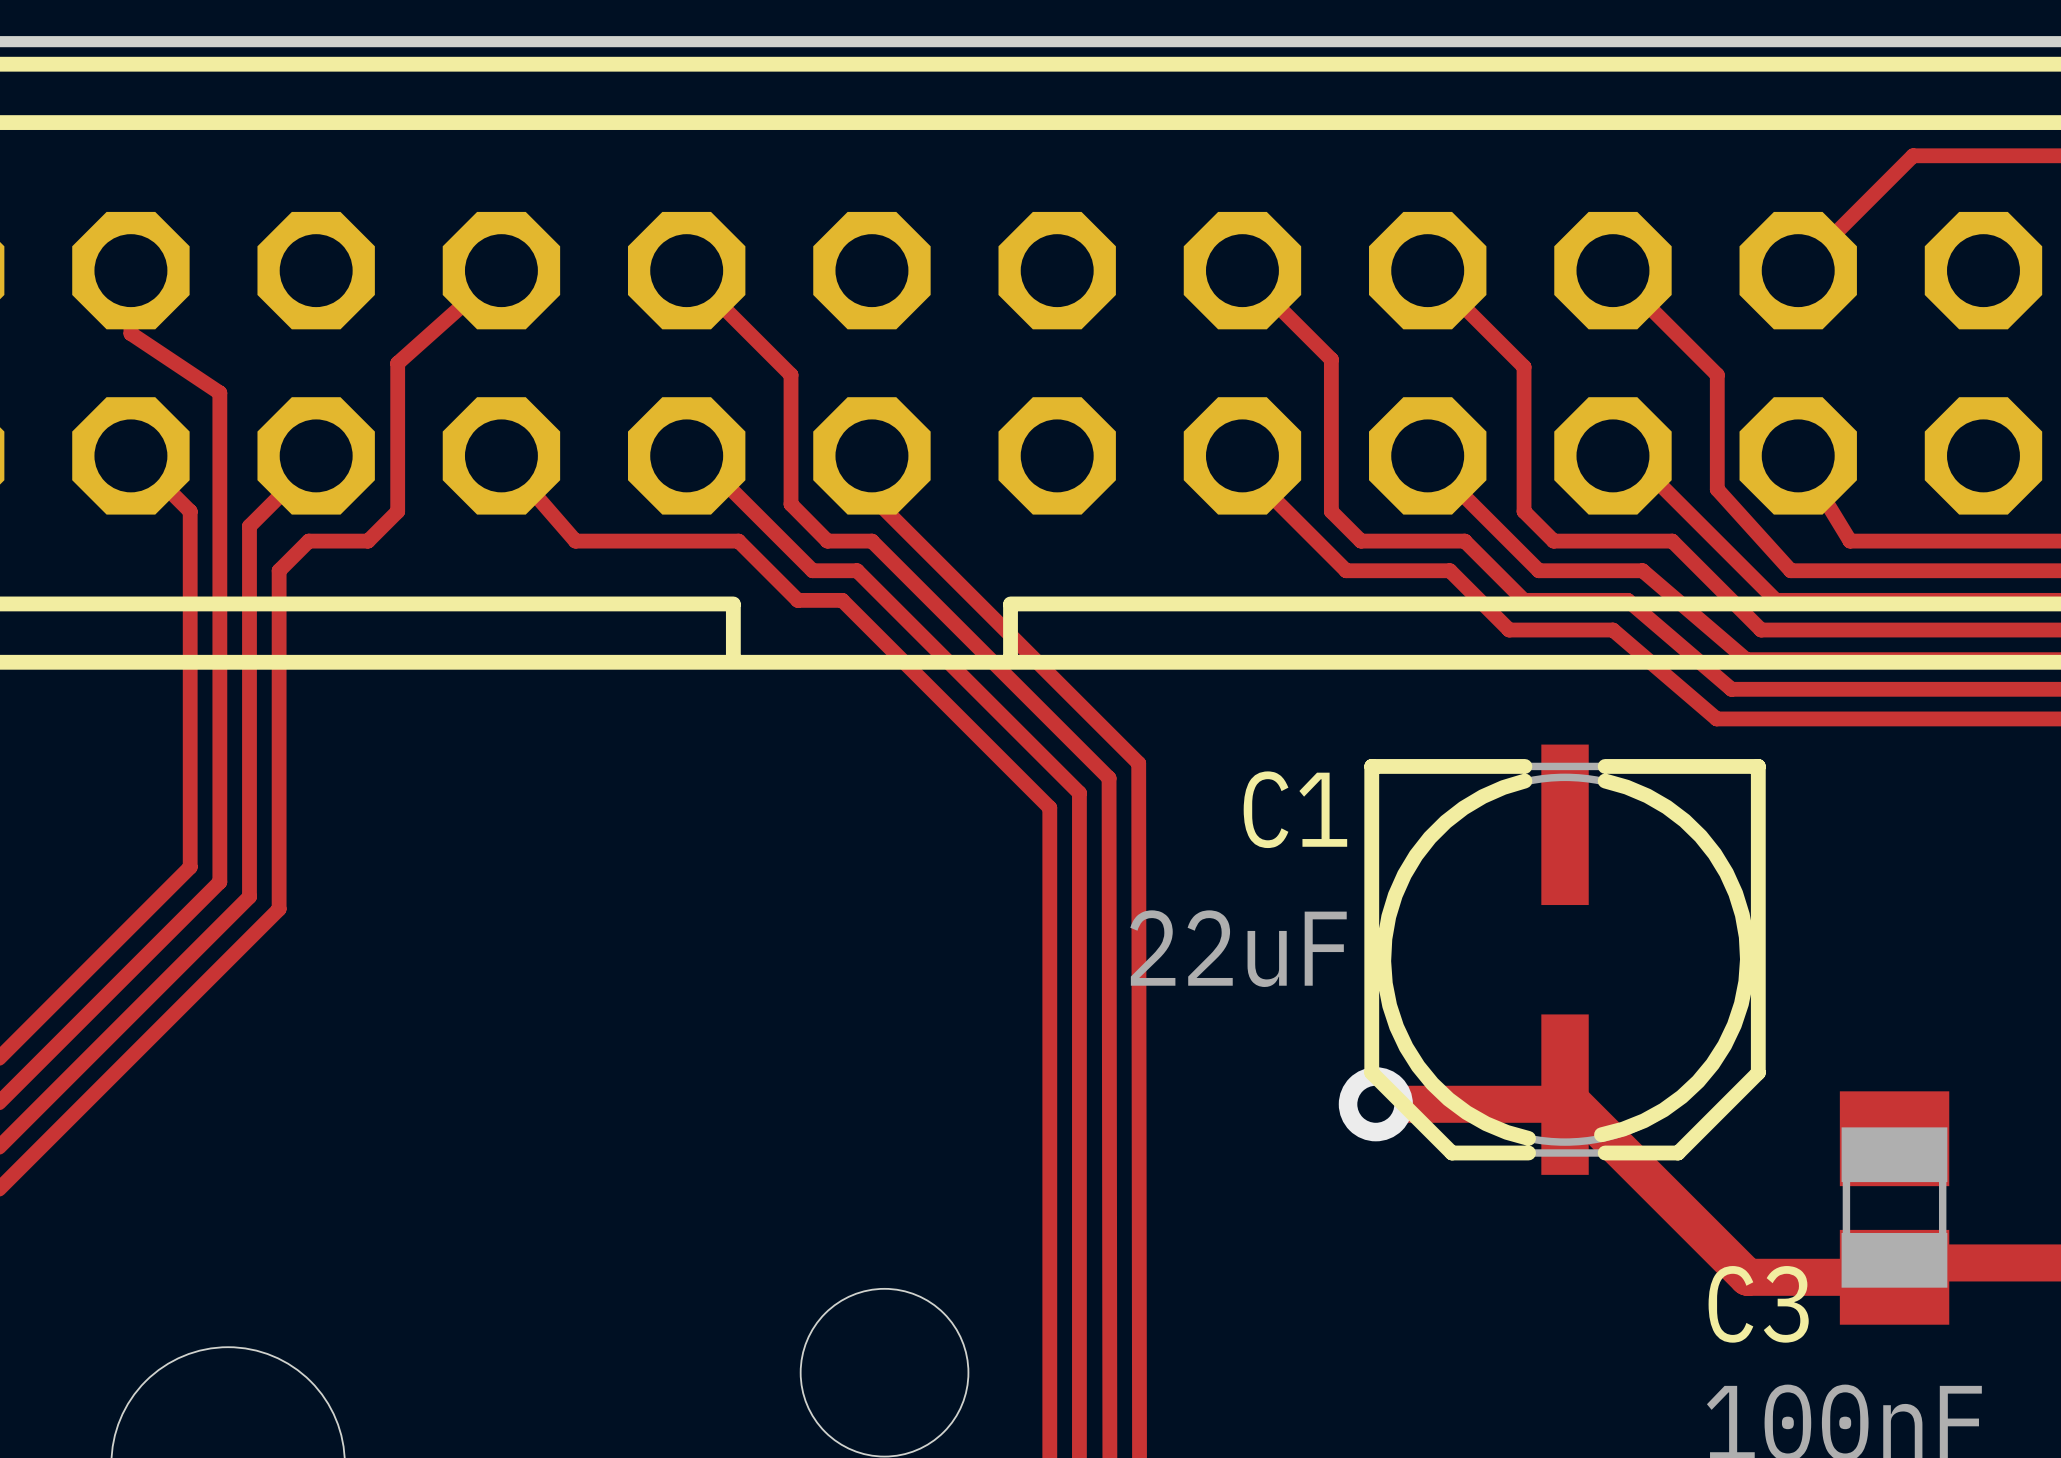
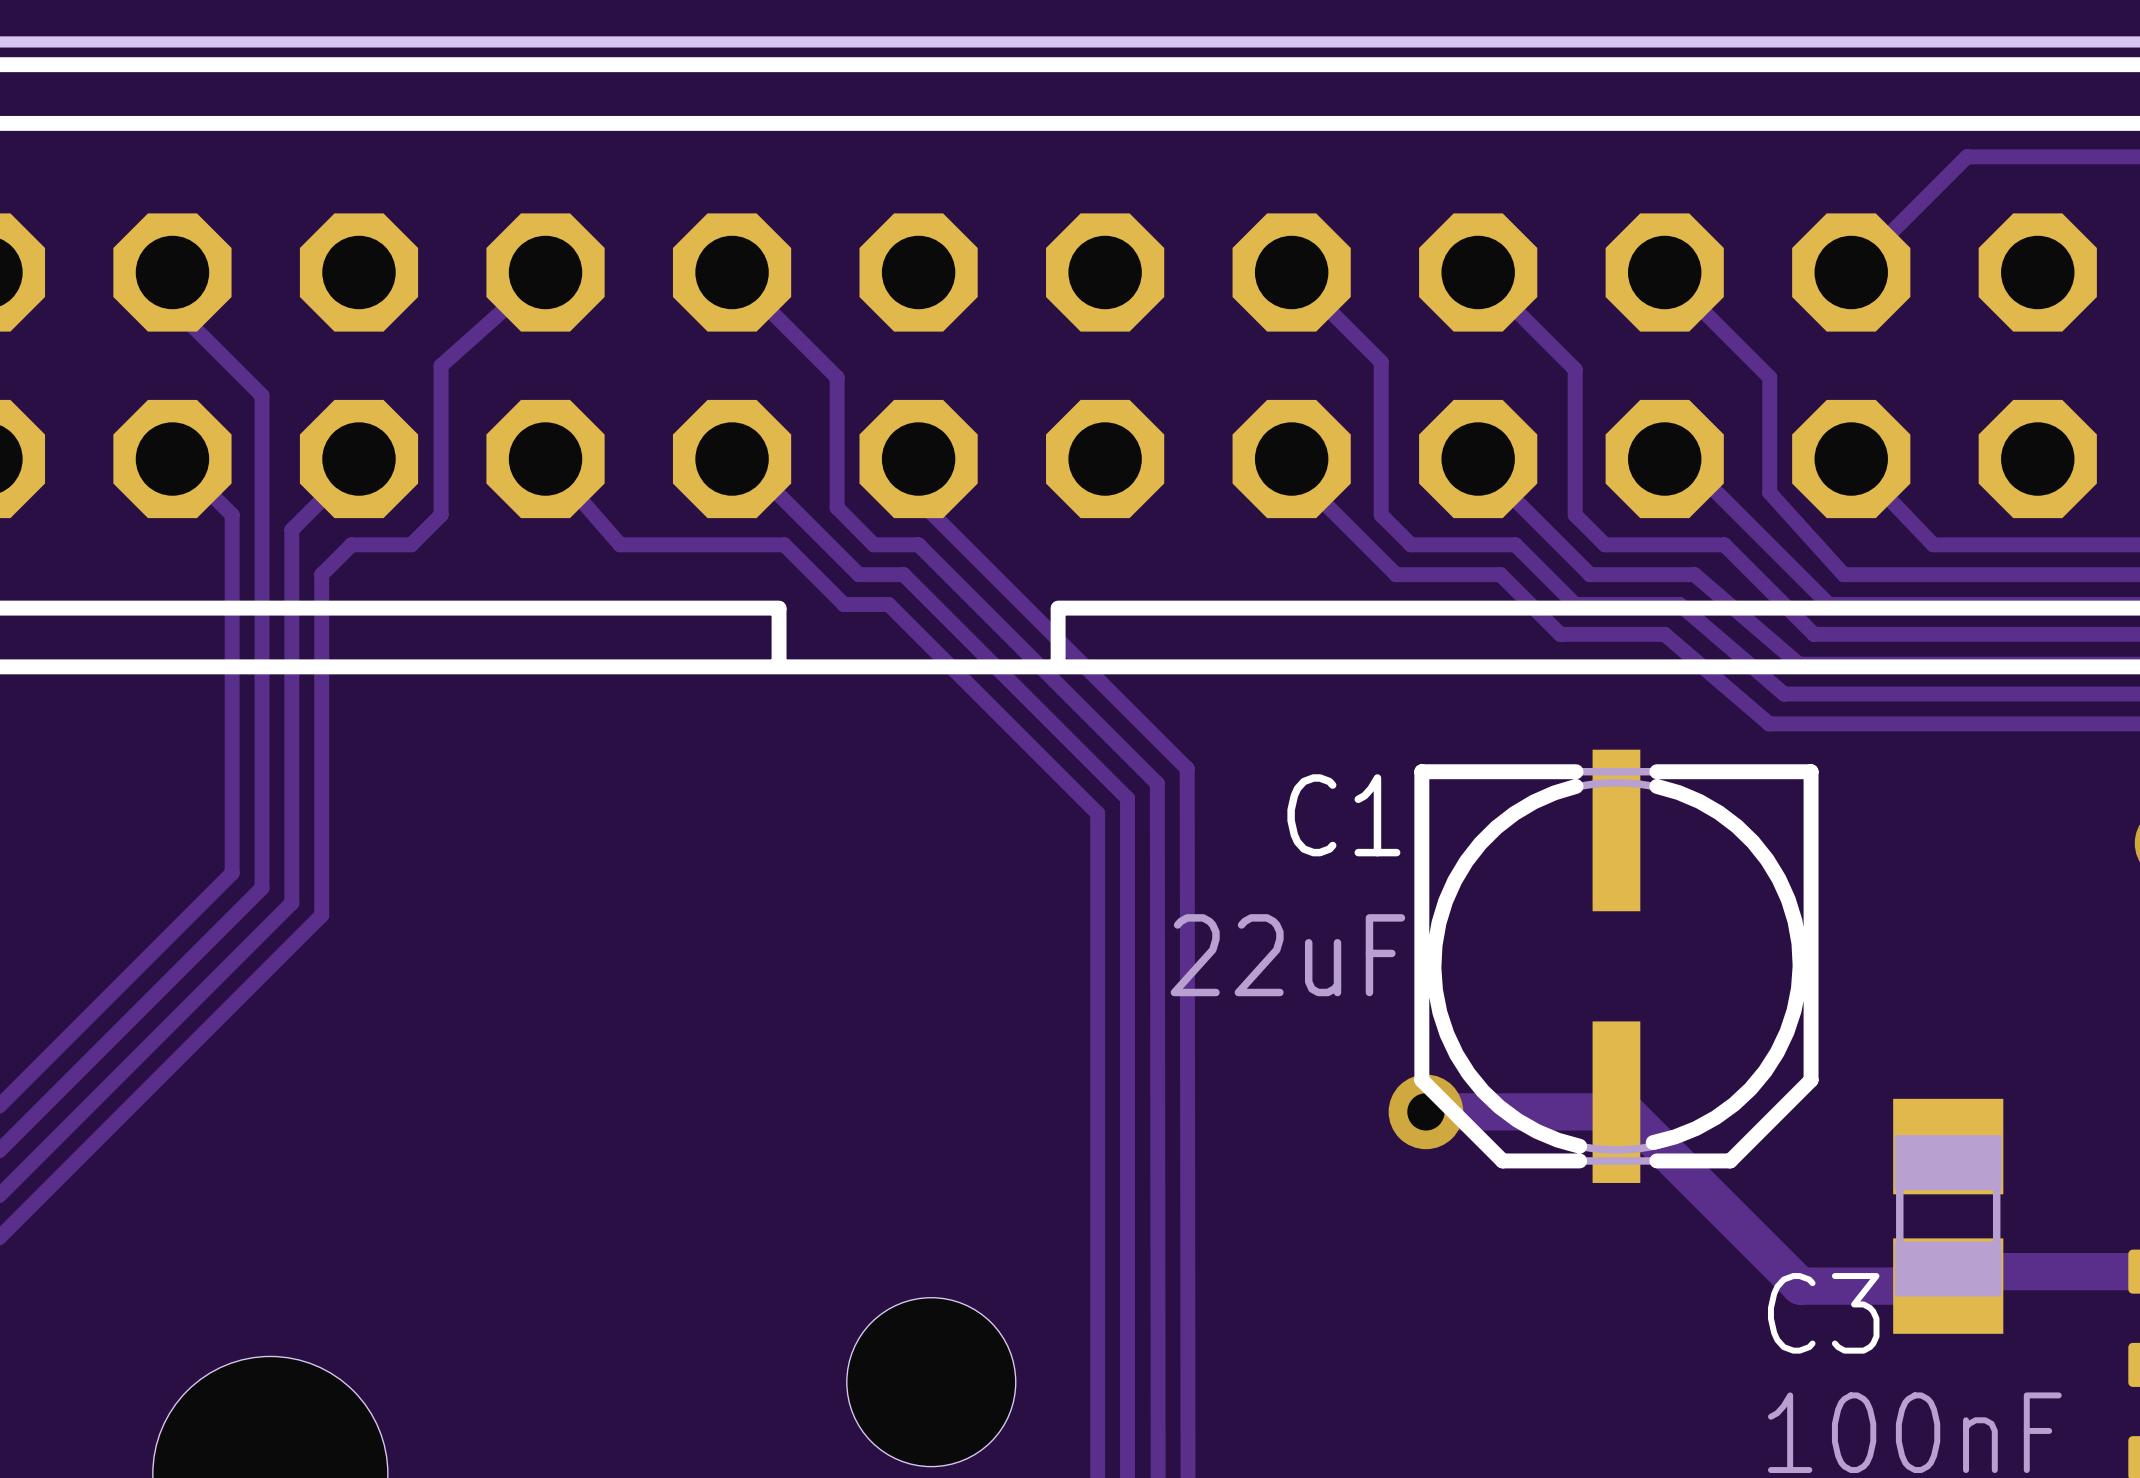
track: (130, 303) (130, 333) (219, 392) -> (172, 306) (262, 395)
track: (1798, 455) (1850, 541) (1879, 541) -> (1851, 459) (1933, 544)

